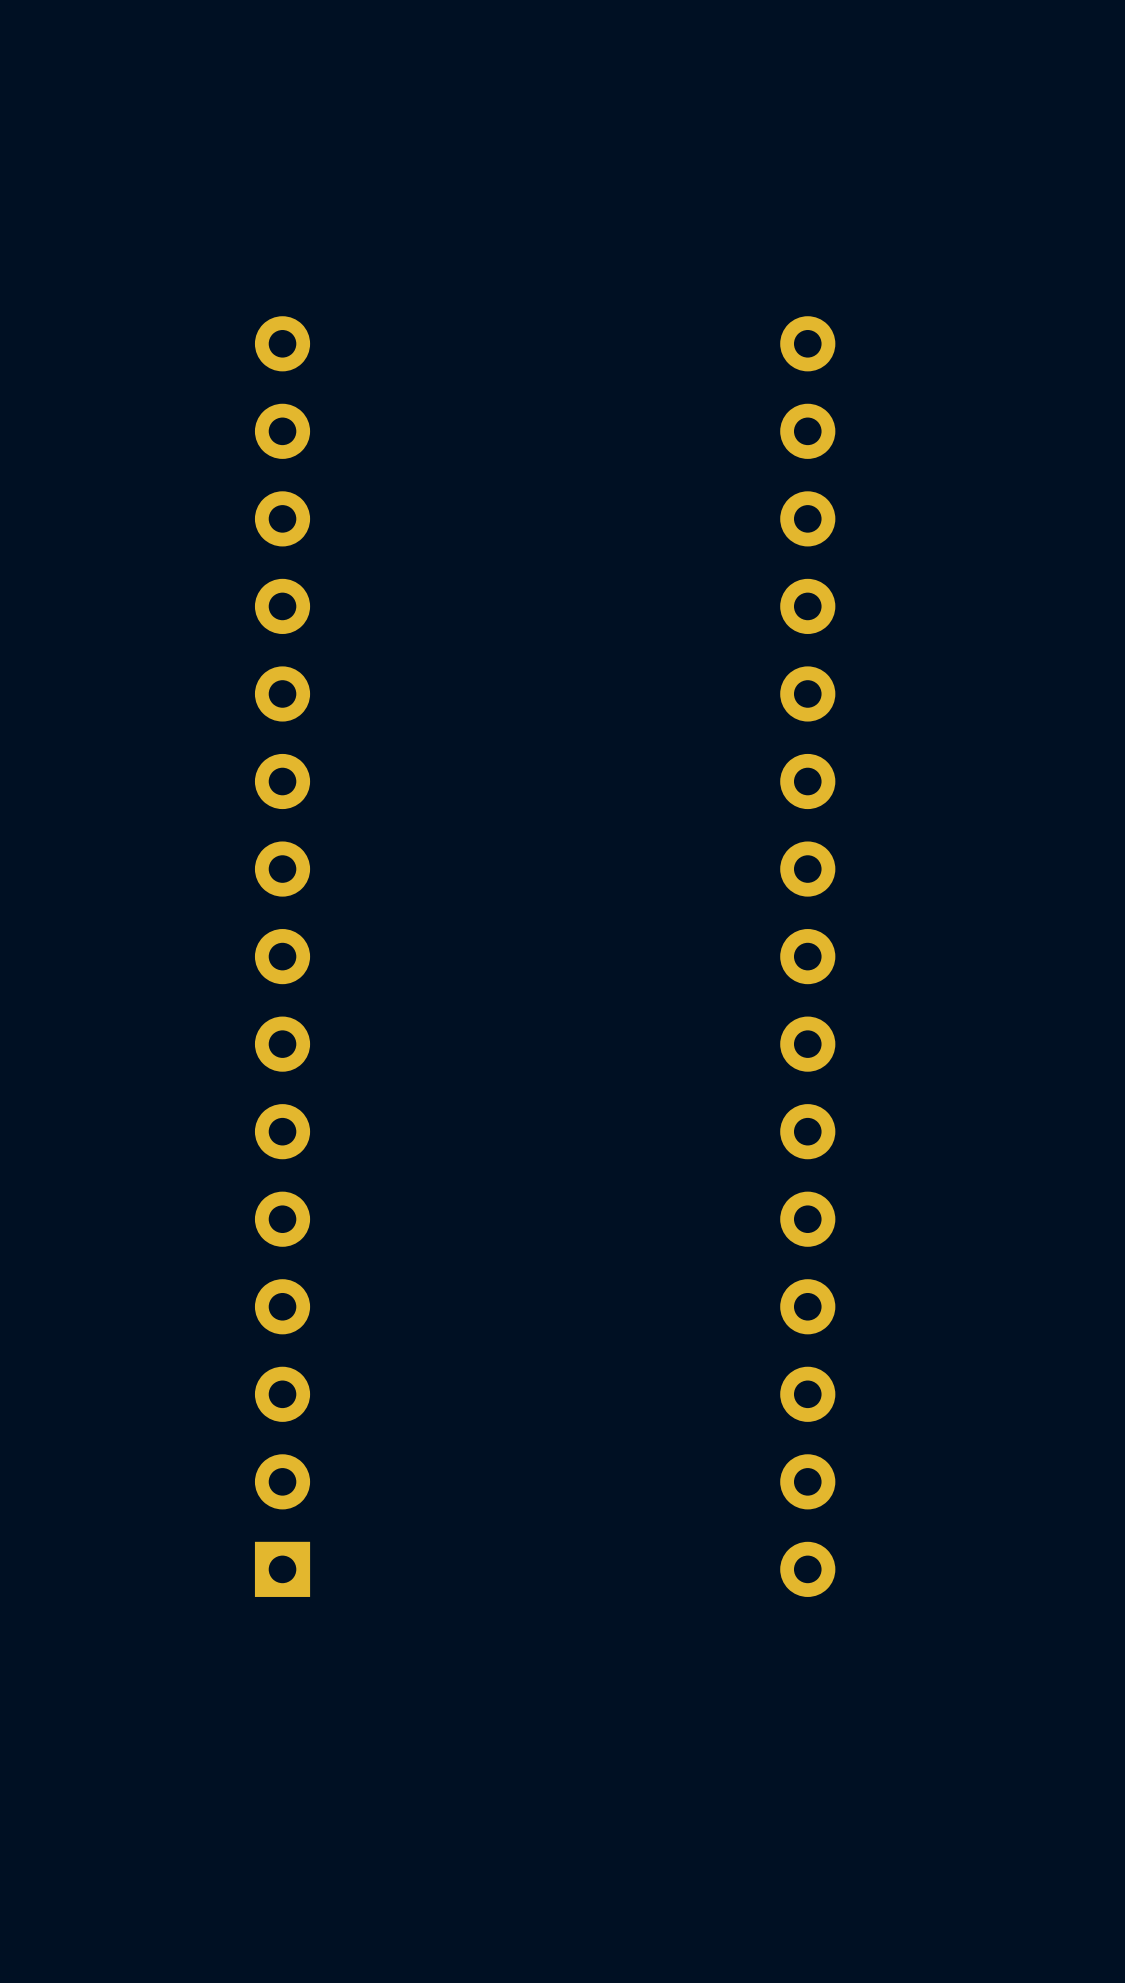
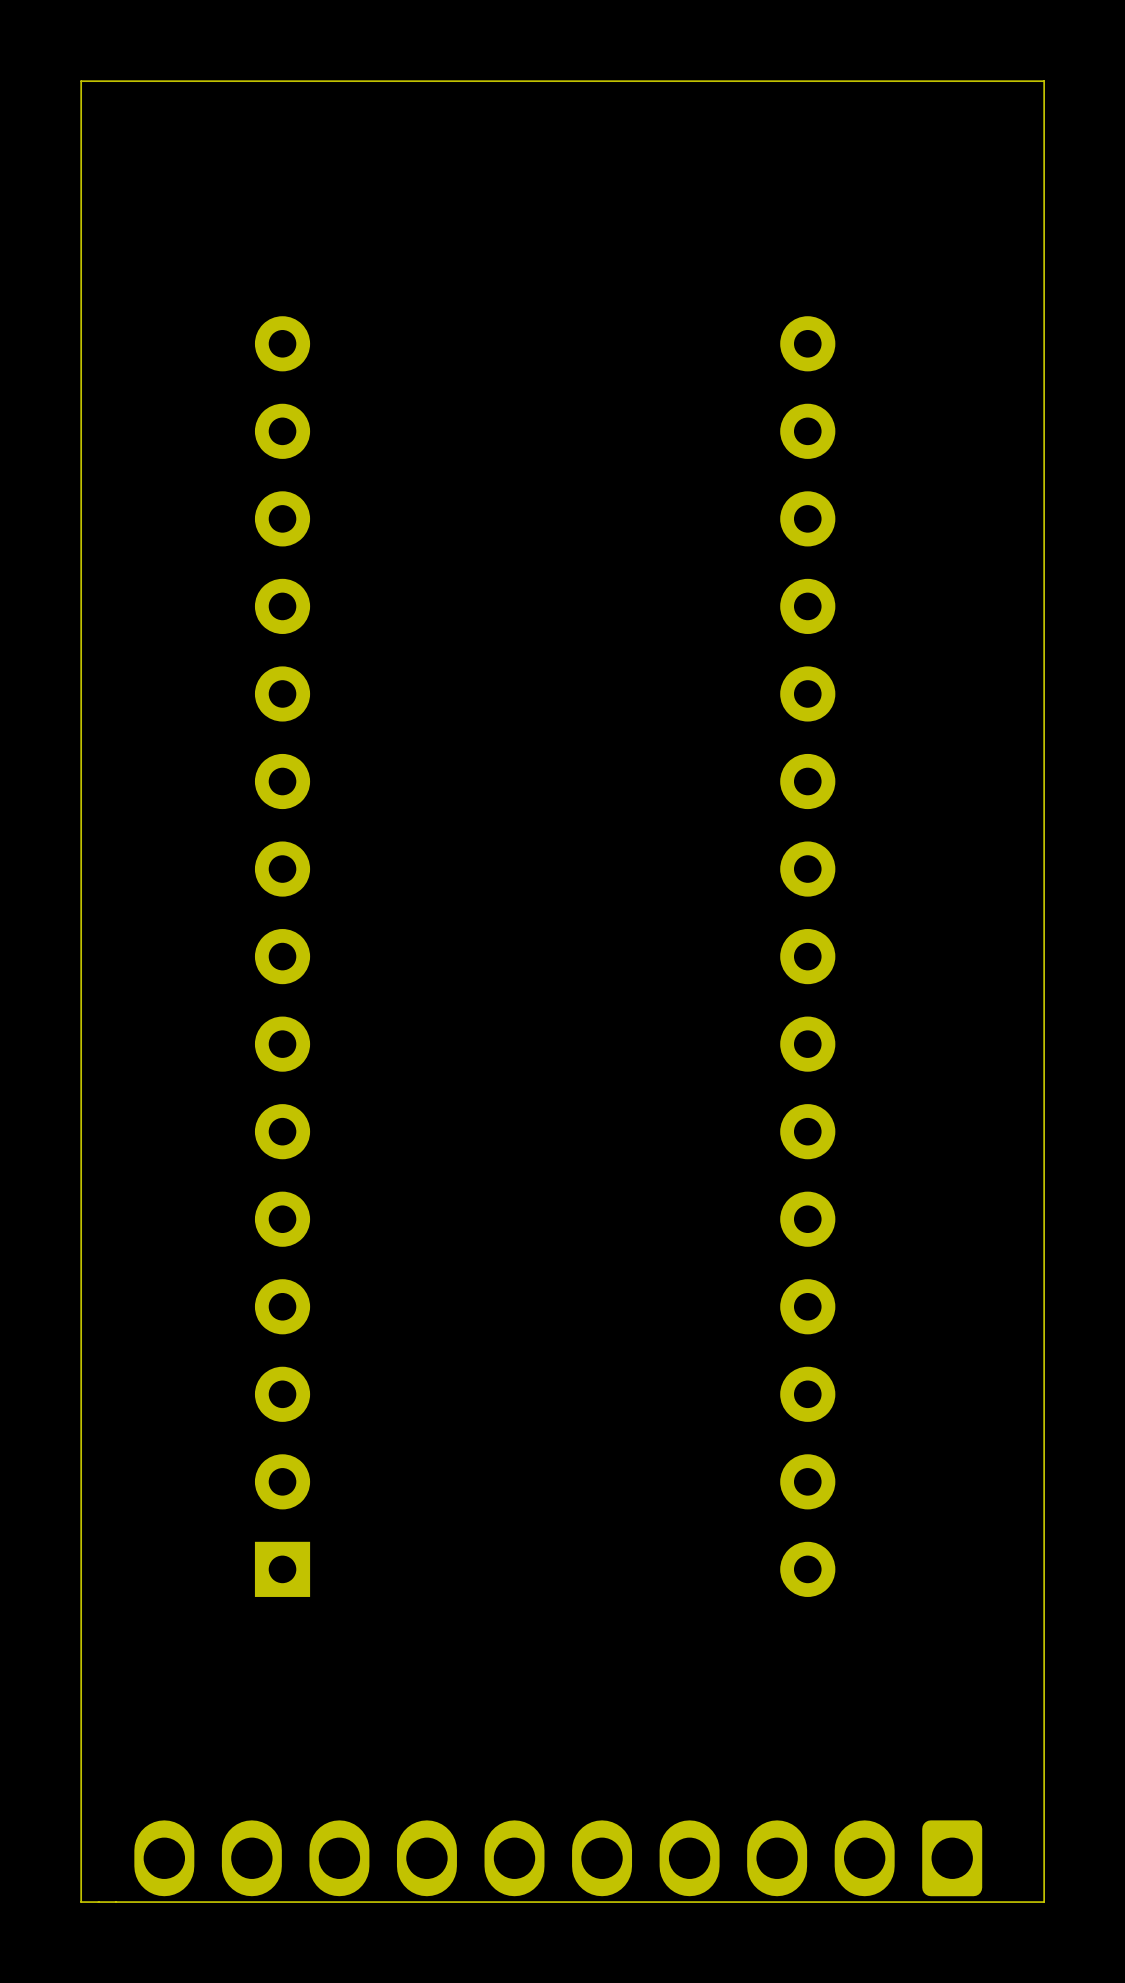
board edge: none -> (1044, 81) (1044, 1902) (81, 1902) (81, 81) (1044, 81)
part: none -> (558, 1858)

